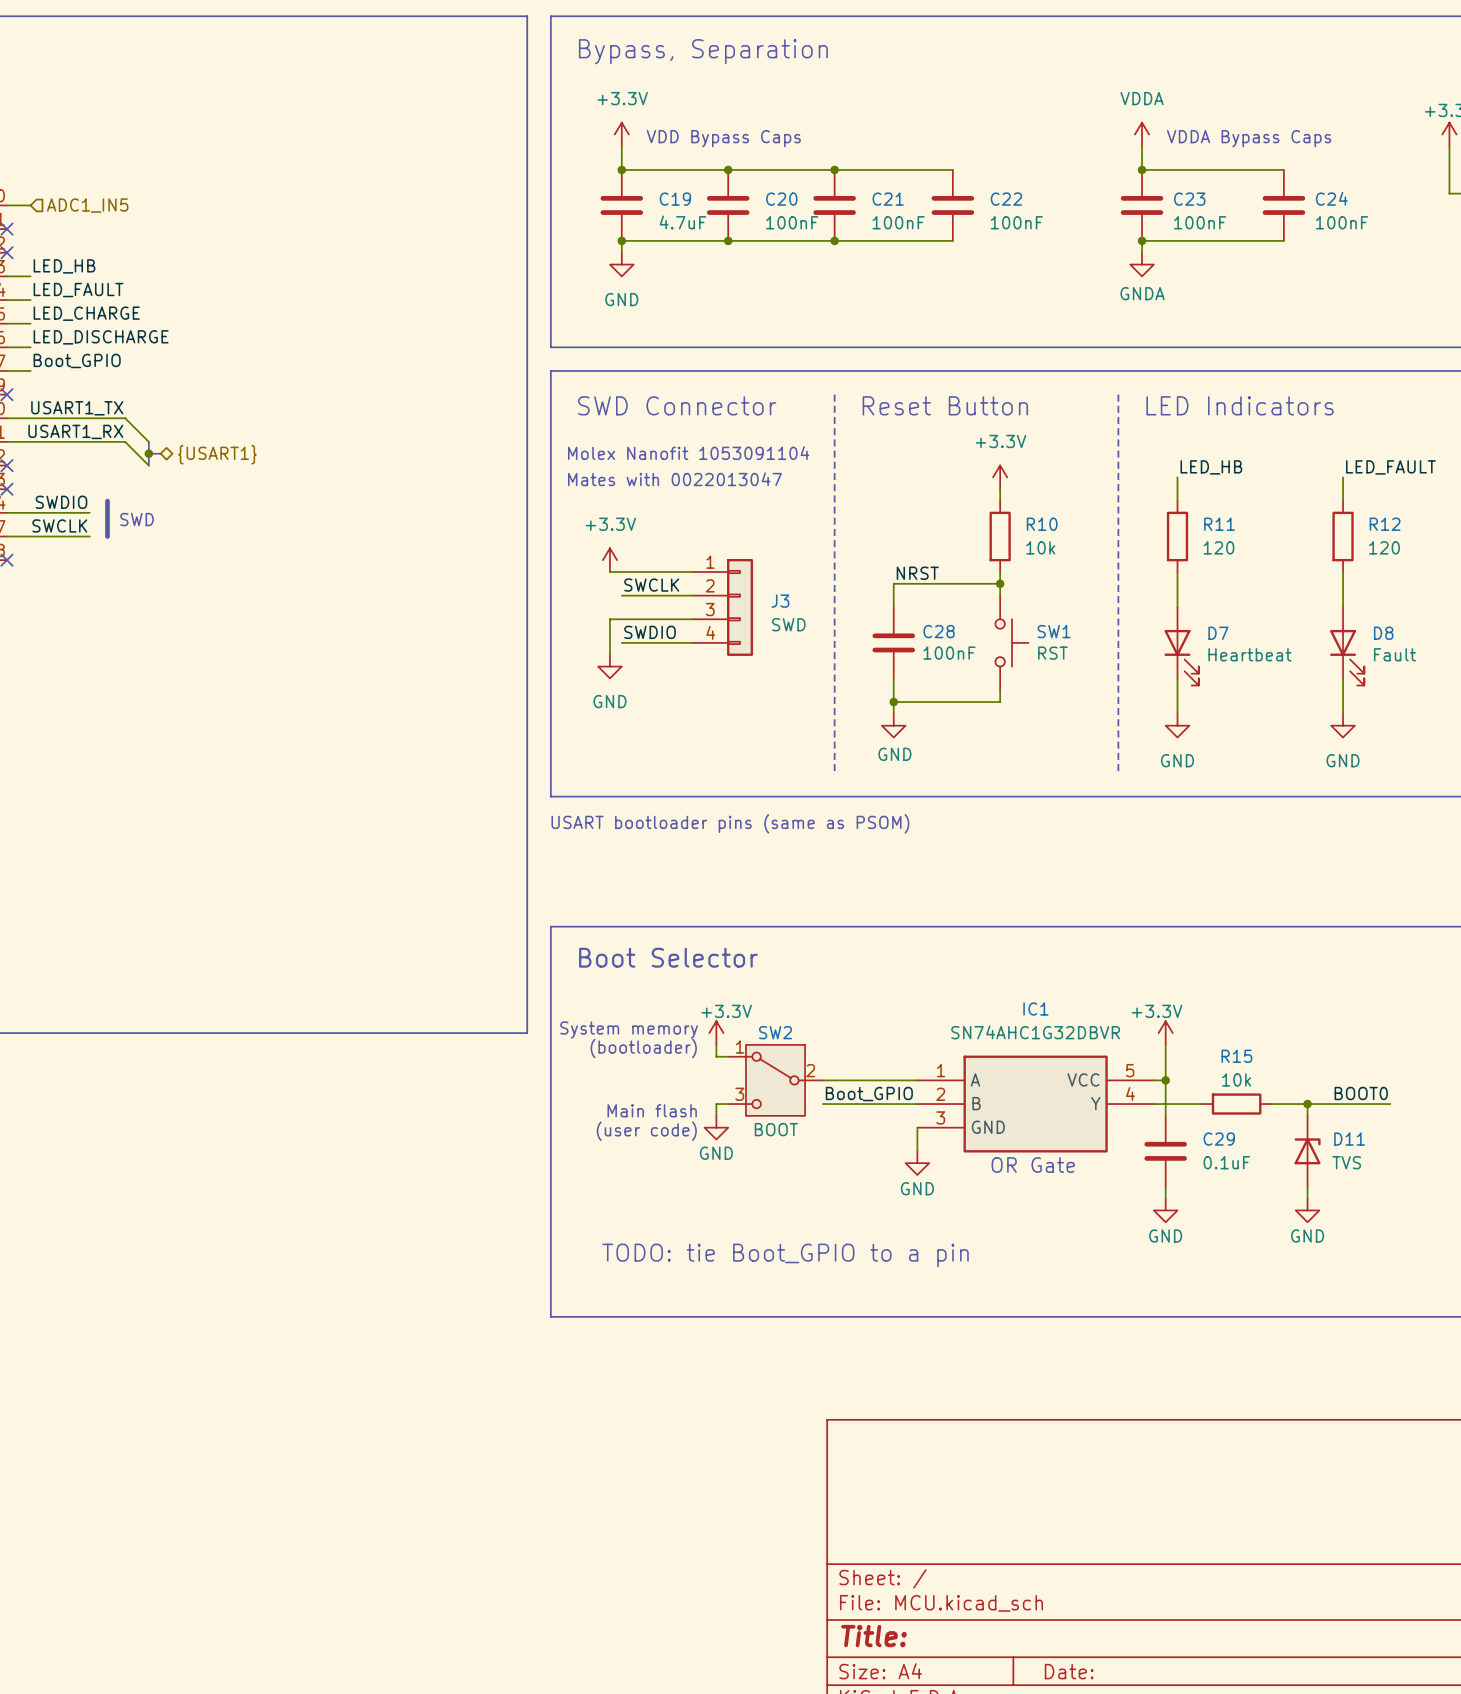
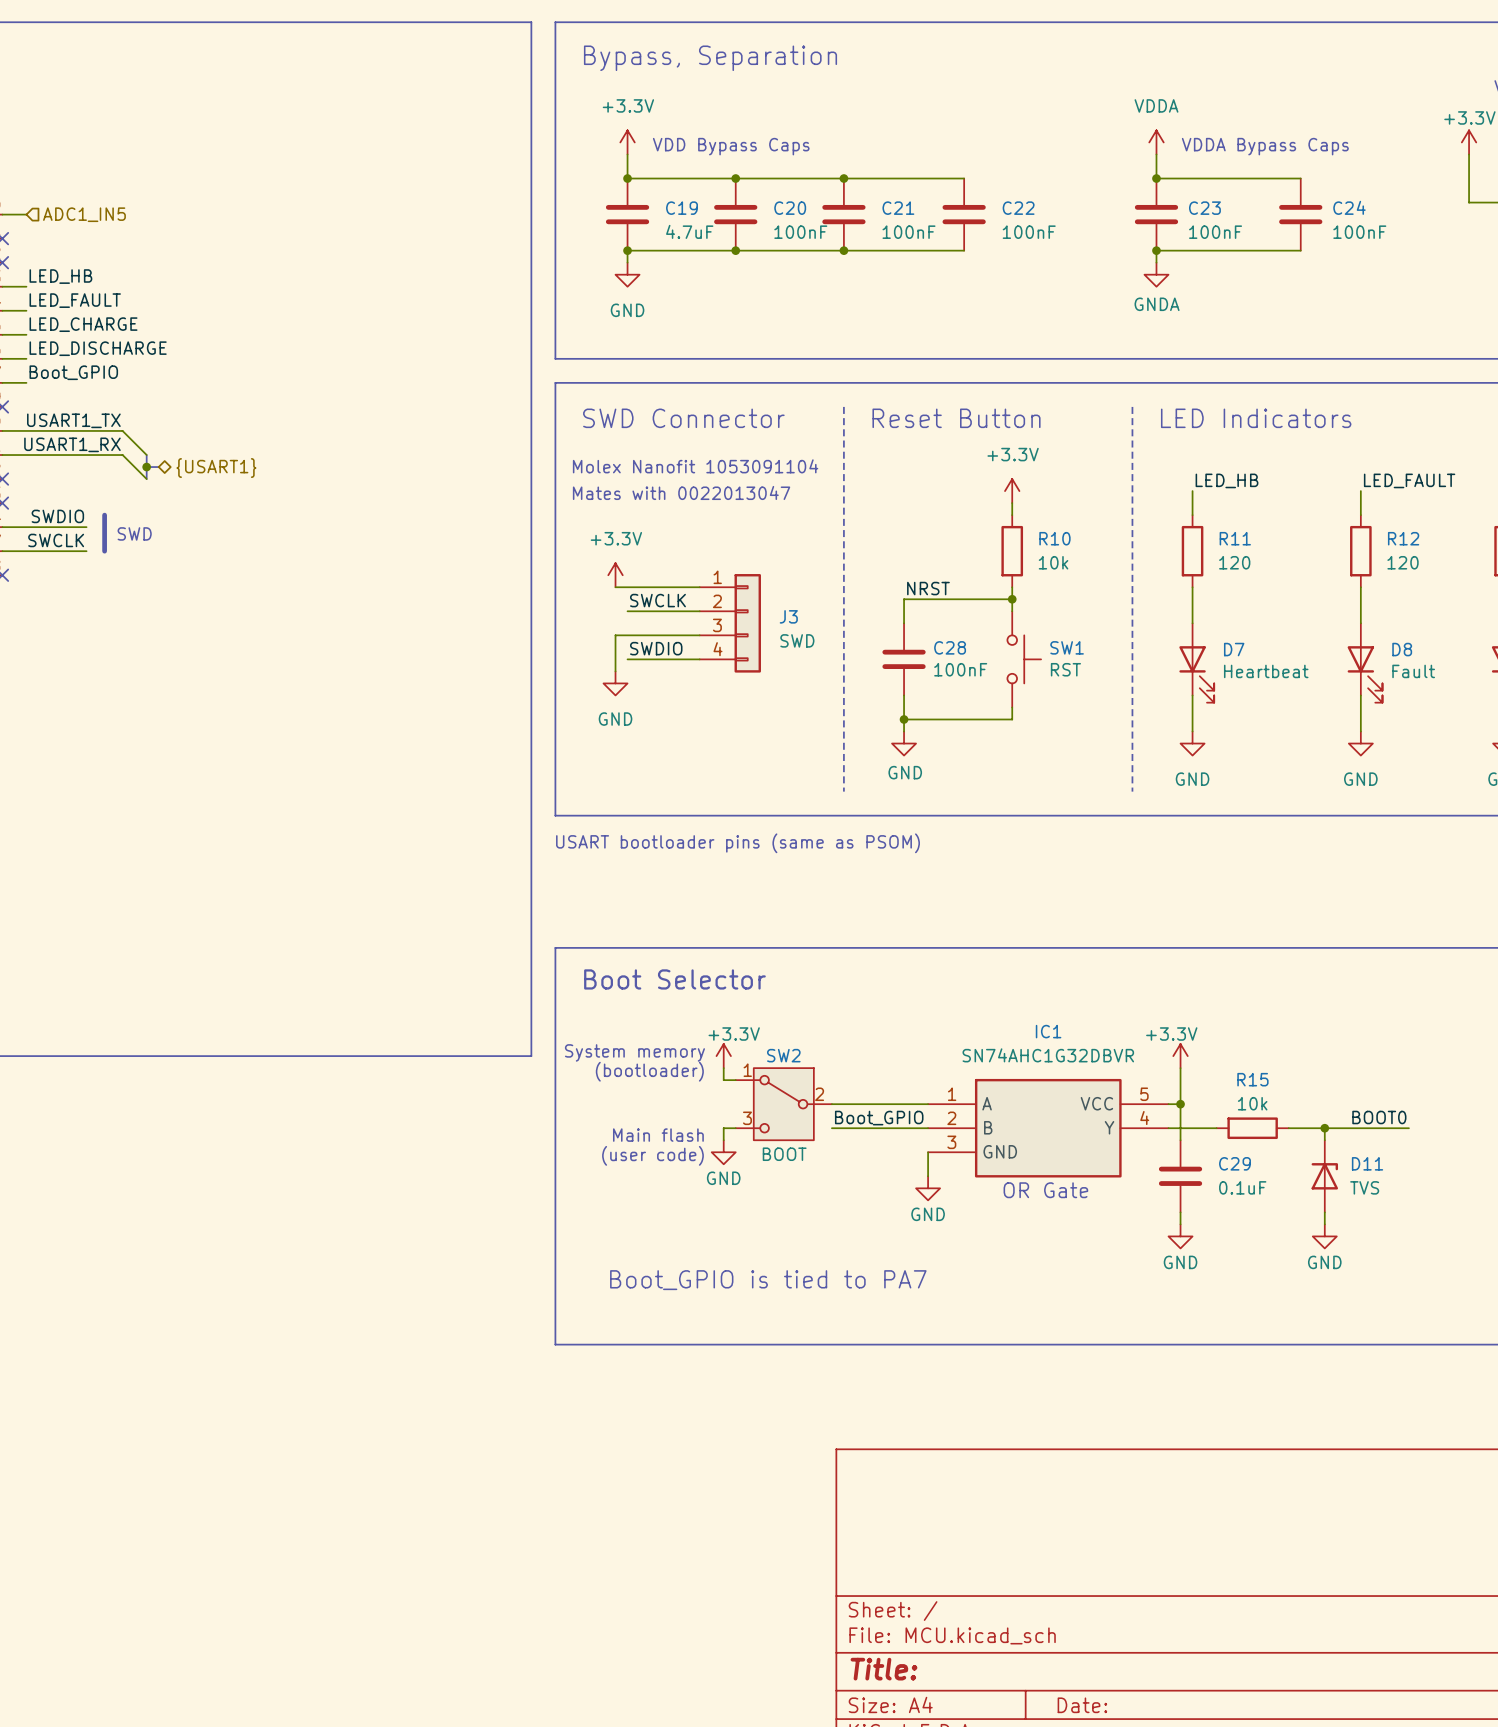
text: TODO: tie Boot_GPIO to a pin (785, 1255) -> Boot_GPIO is tied to PA7 (768, 1280)

